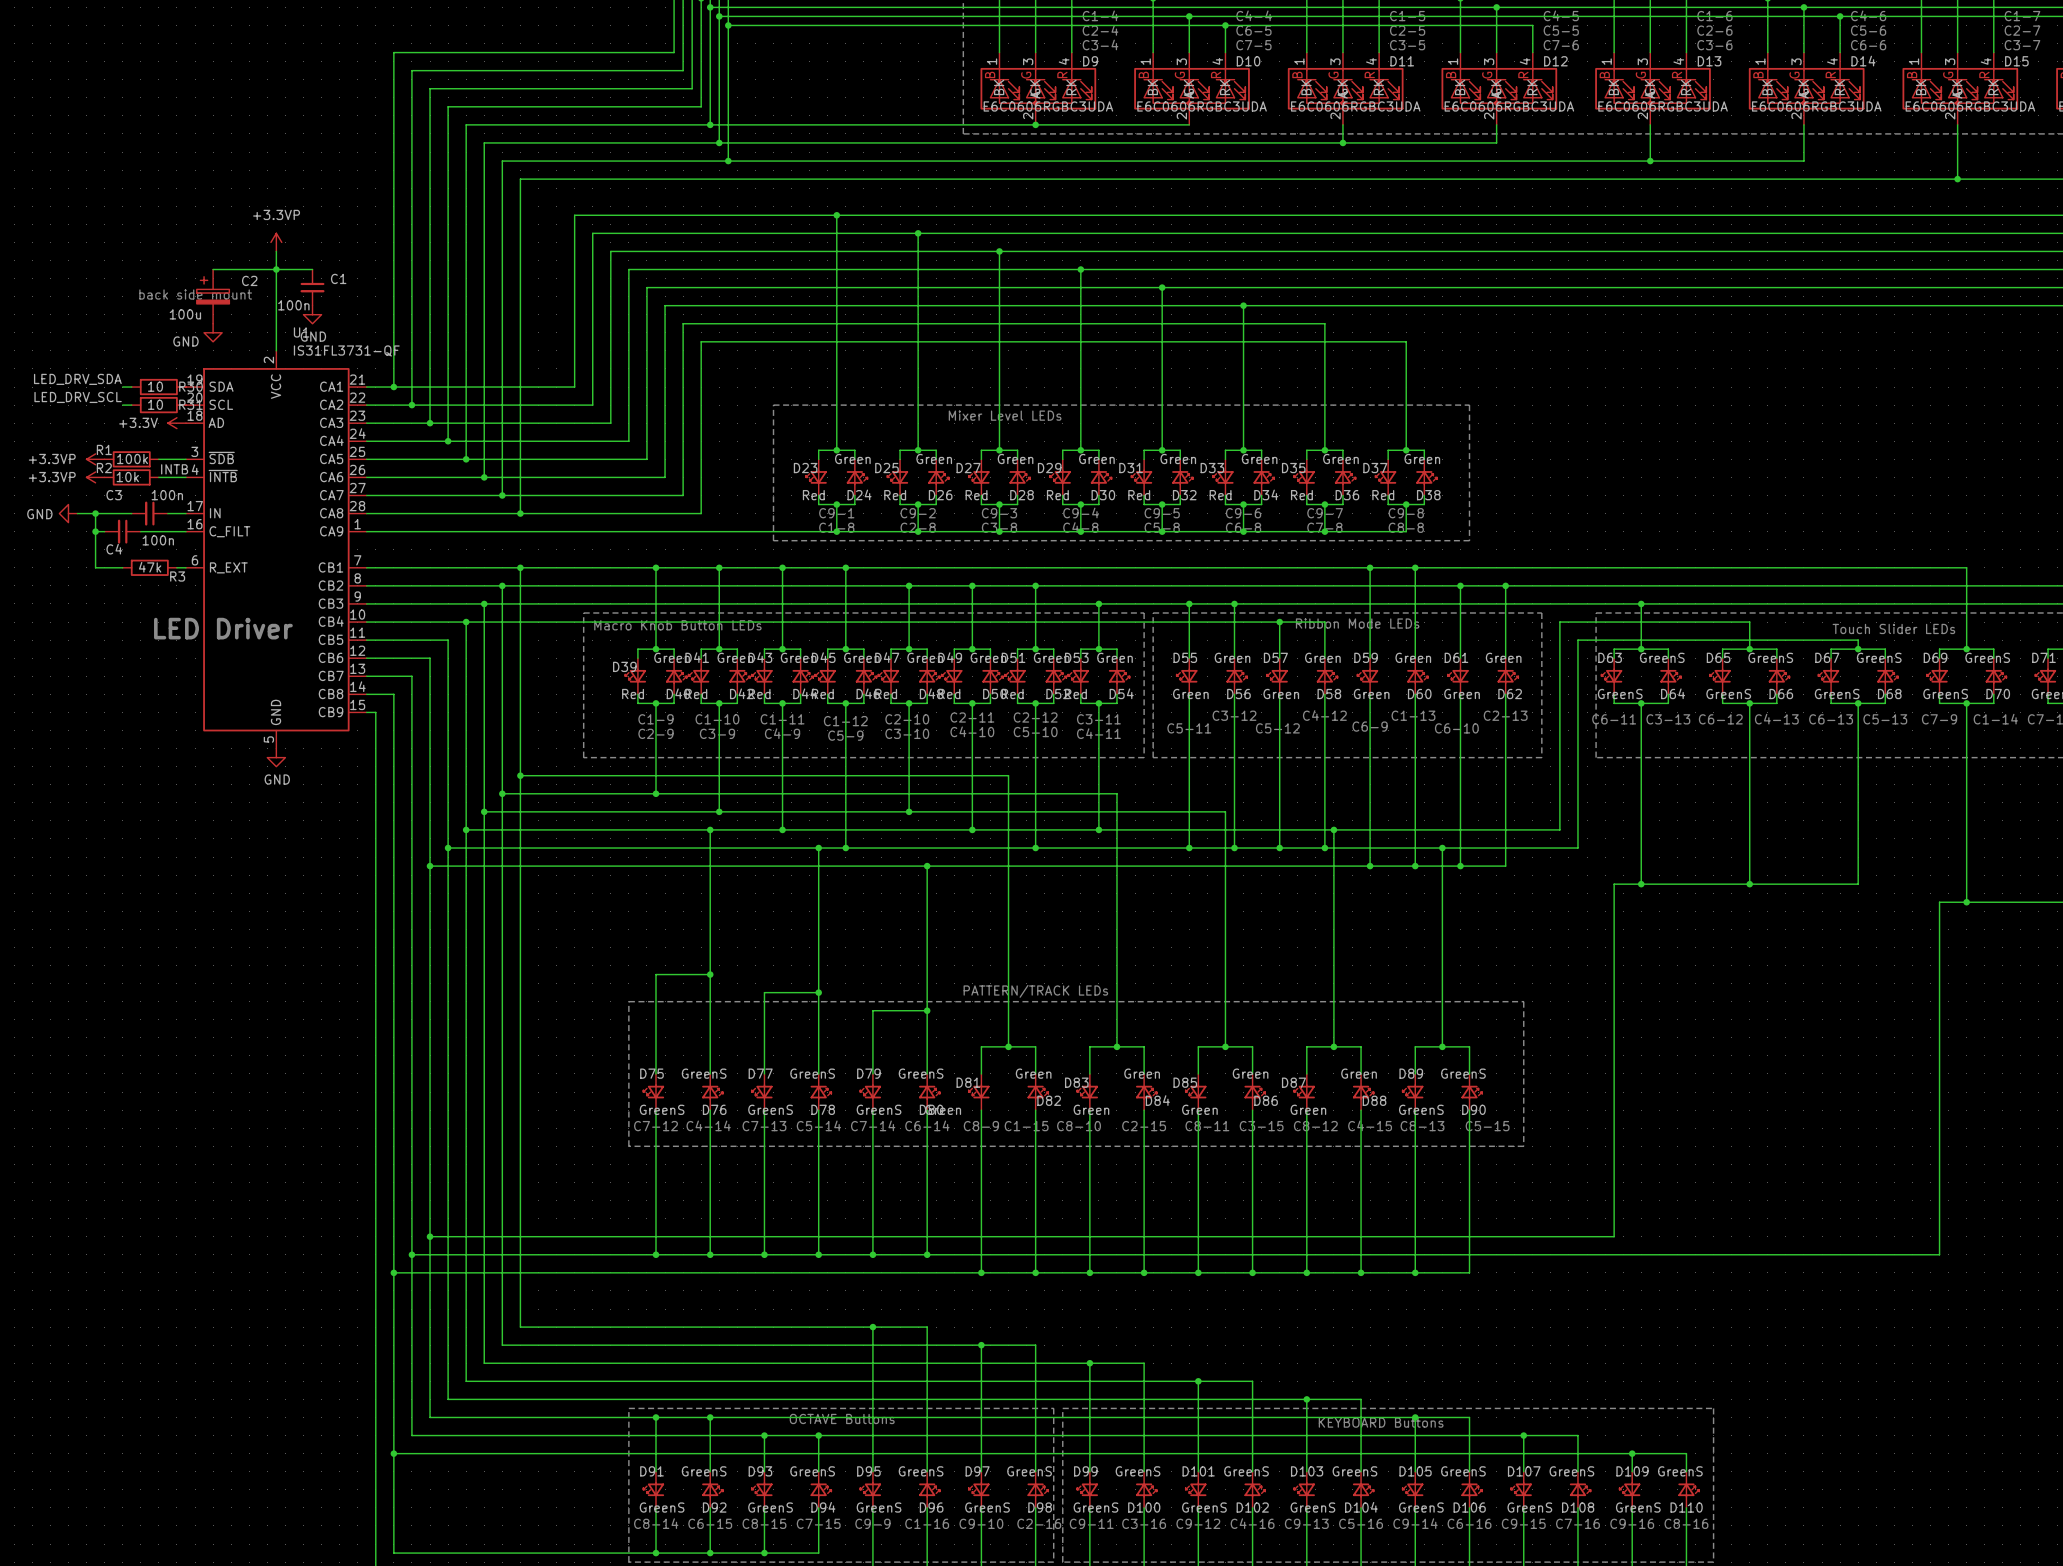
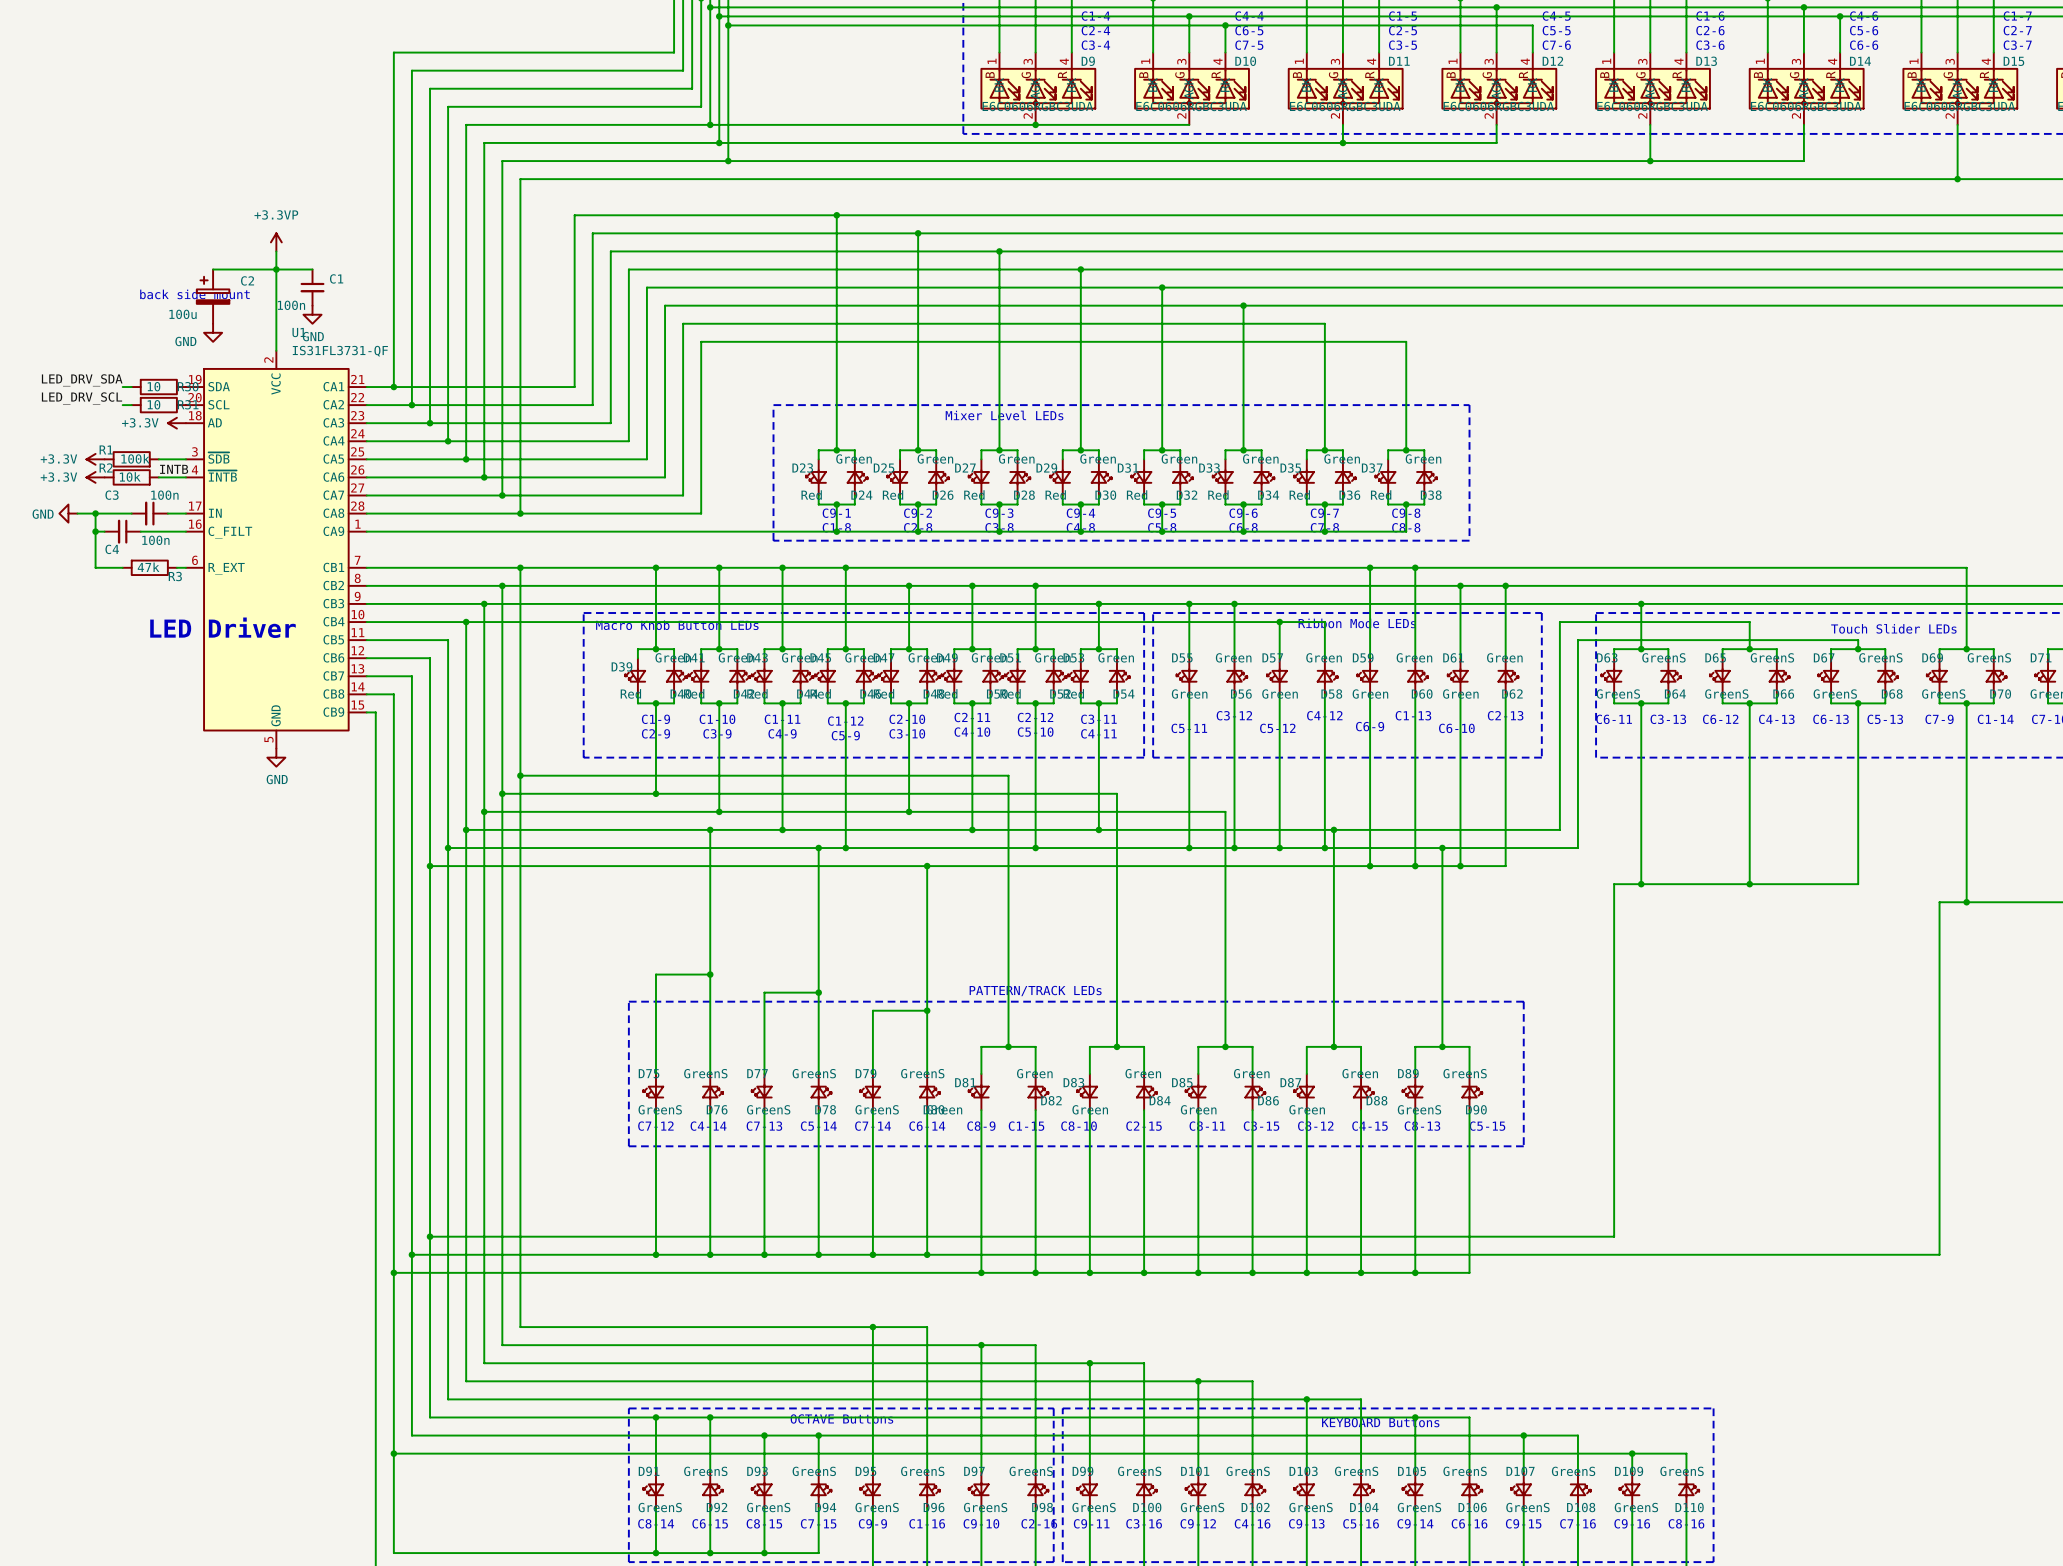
power symbol: +3.3VP (95, 459) -> +3.3V (95, 459)
power symbol: +3.3VP (95, 477) -> +3.3V (95, 477)

